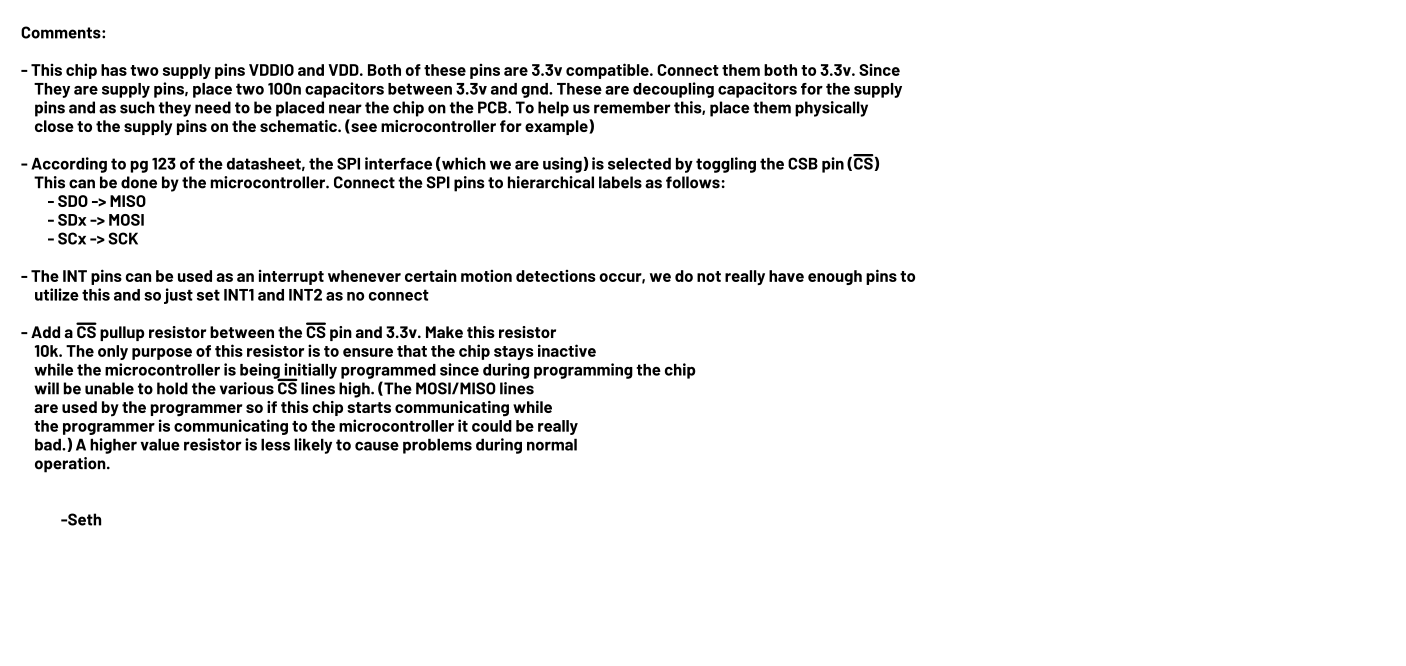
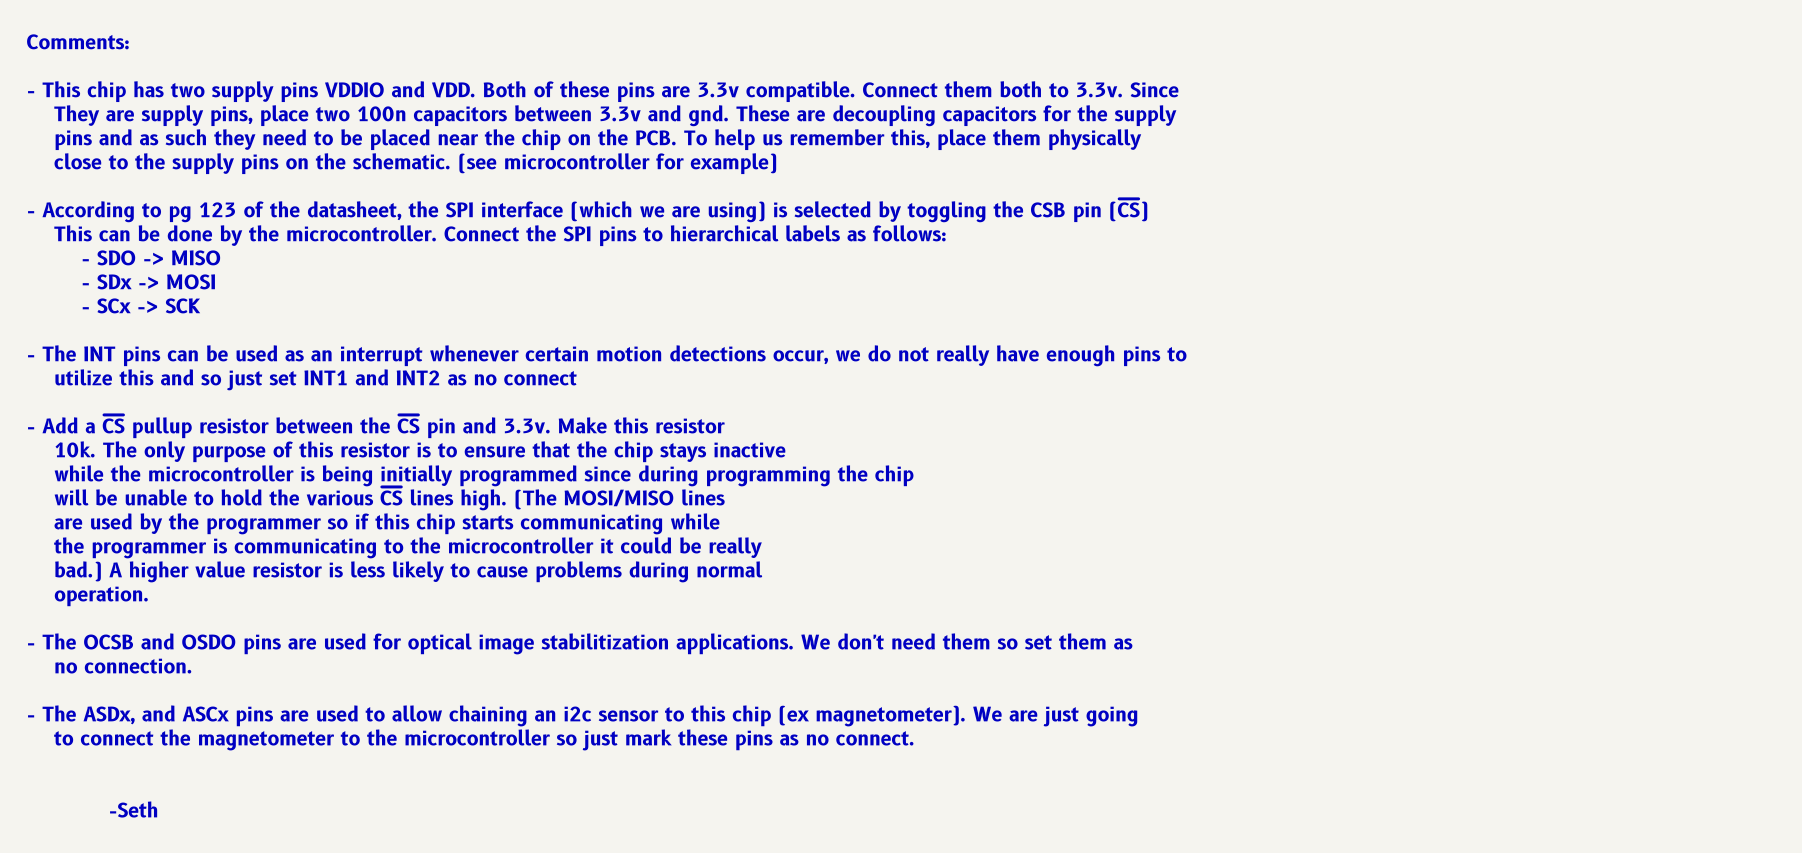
text: none -> - The OCSB and OSDO pins are used for optical image stabilitization applications. We don't need them so set them as (580, 643)
text: -Seth (81, 519) -> no connection. (123, 666)
text: none -> - The ASDx, and ASCx pins are used to allow chaining an i2c sensor to this chip (ex magnetometer). We are just going (582, 715)
text: none -> to connect the magnetometer to the microcontroller so just mark these pins as no connect. (483, 739)
text: none -> -Seth (133, 809)

